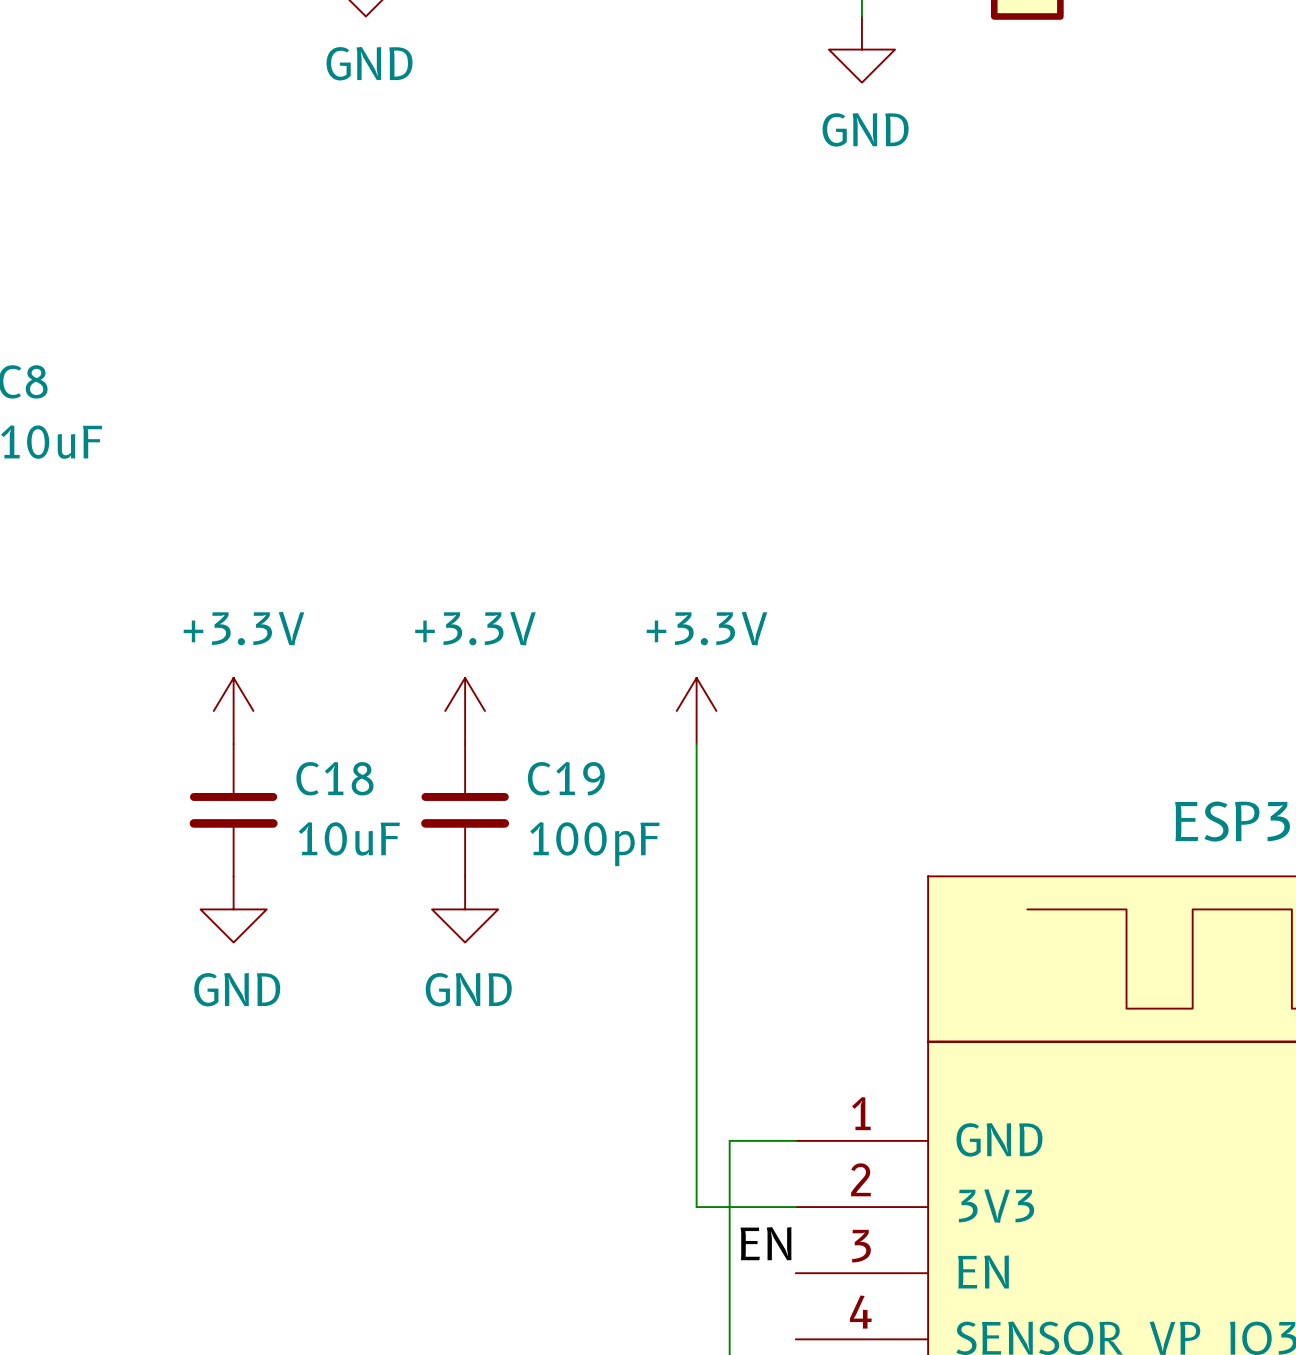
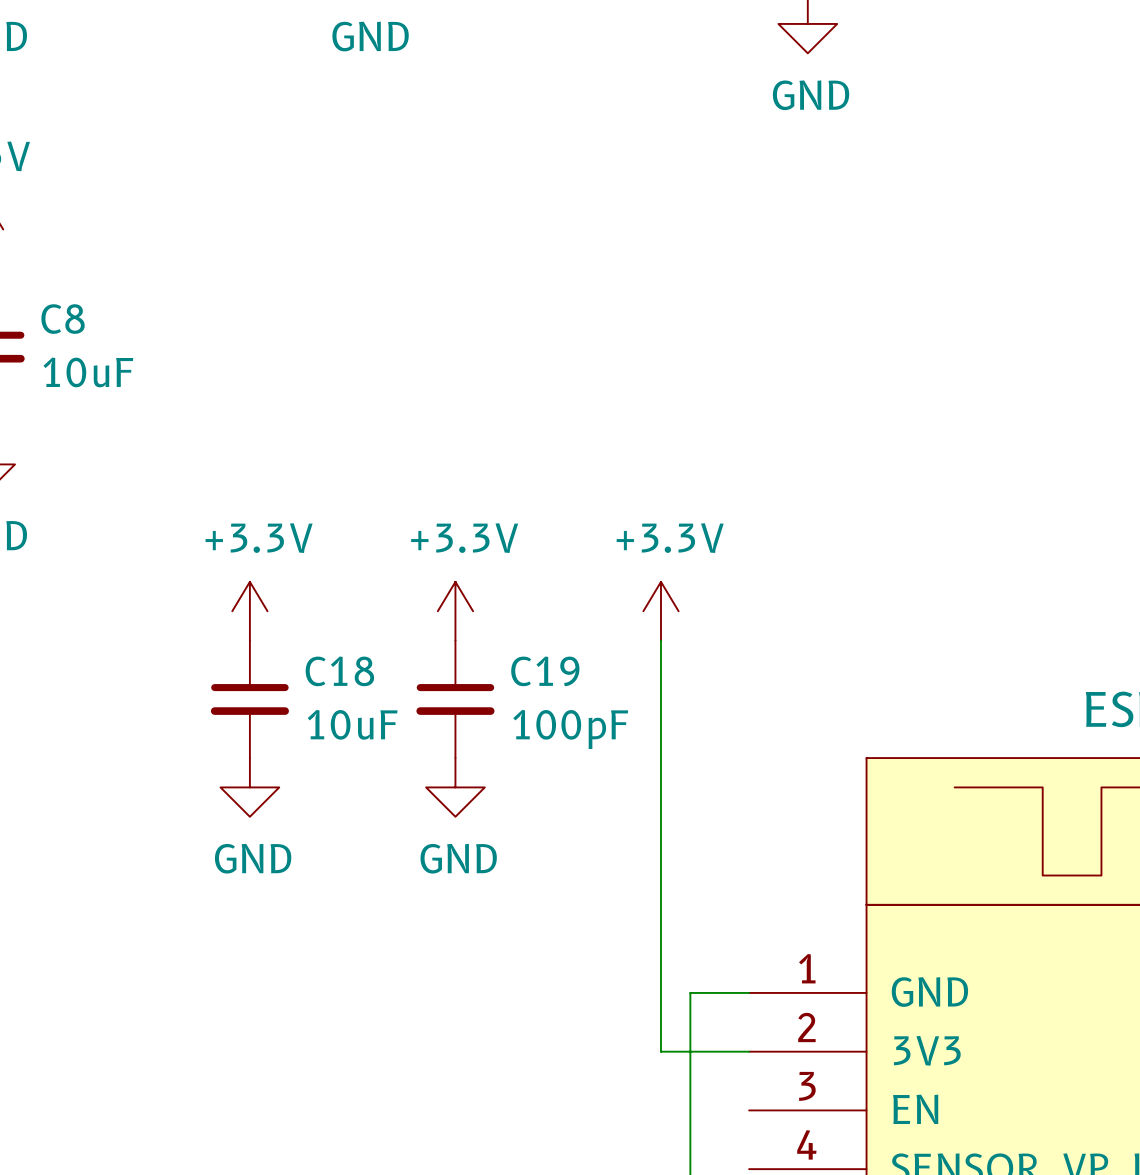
label: EN (765, 1243) -> none

